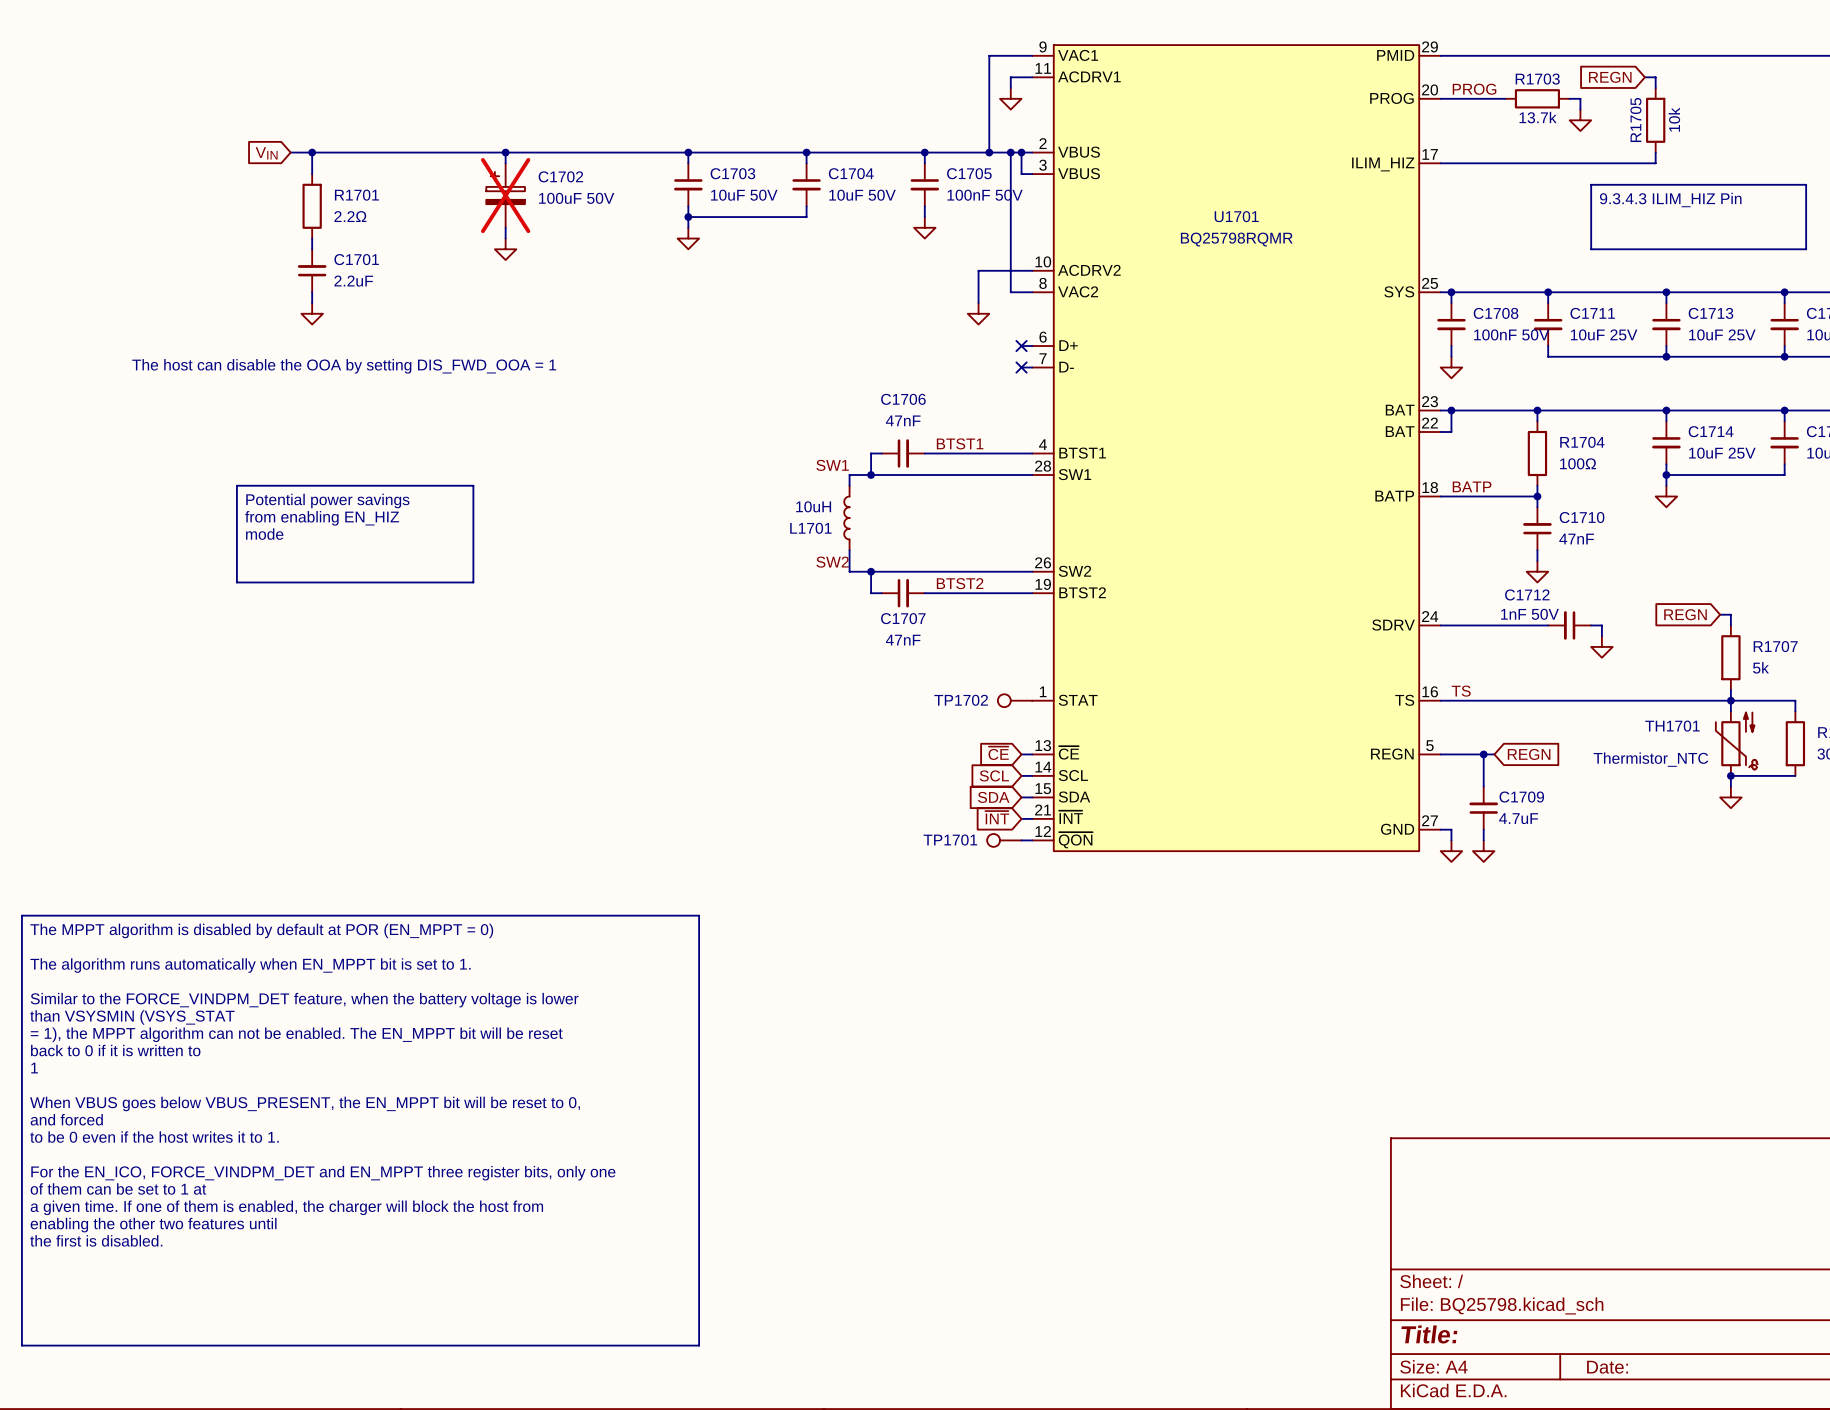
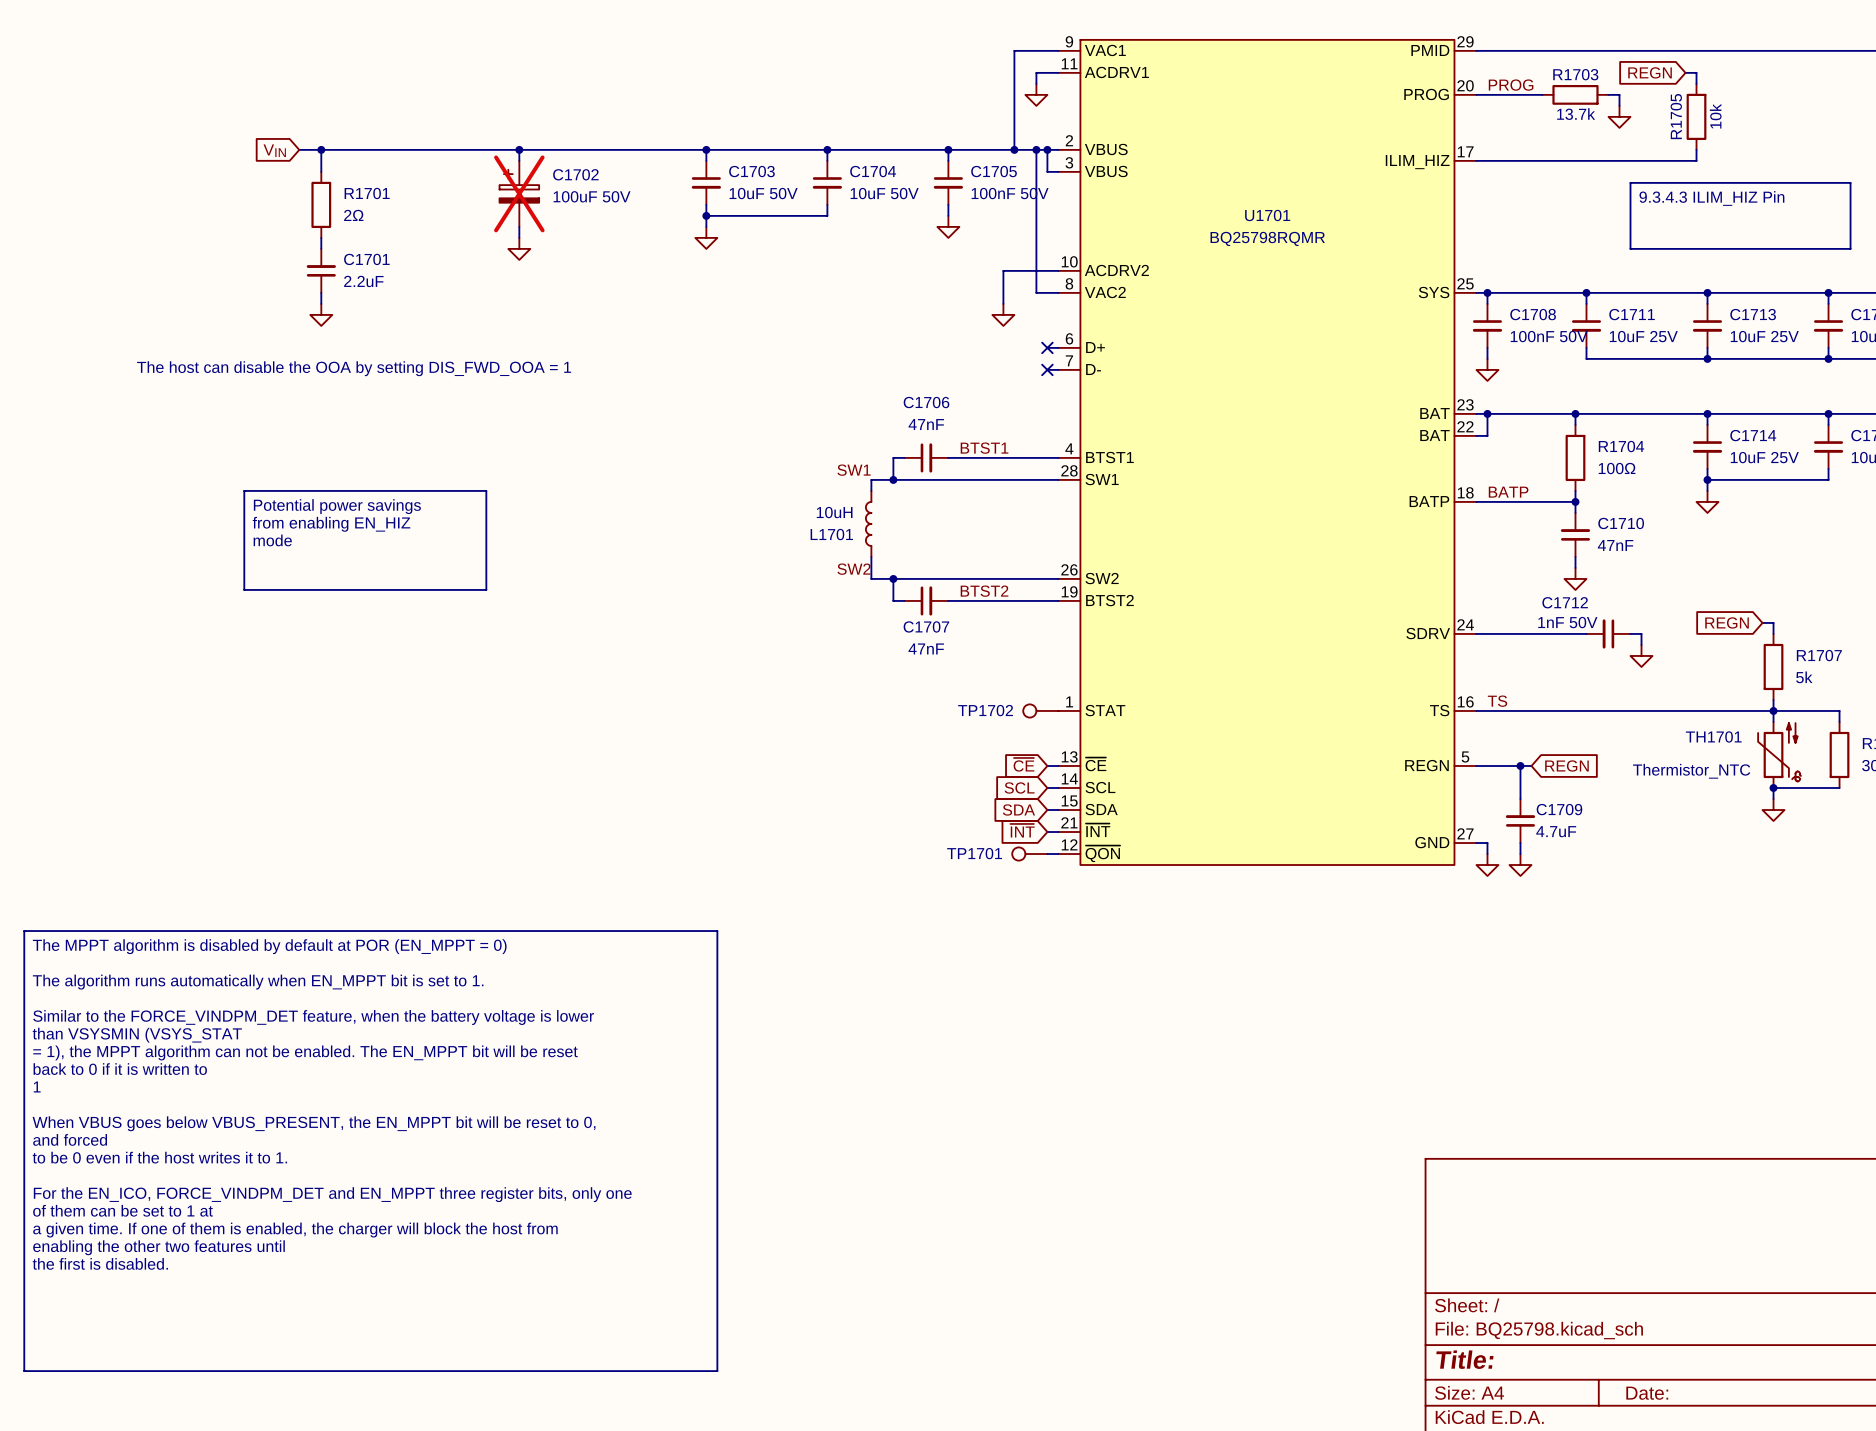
R1701 value: 2.2Ω (350, 216) -> 2Ω (353, 215)

